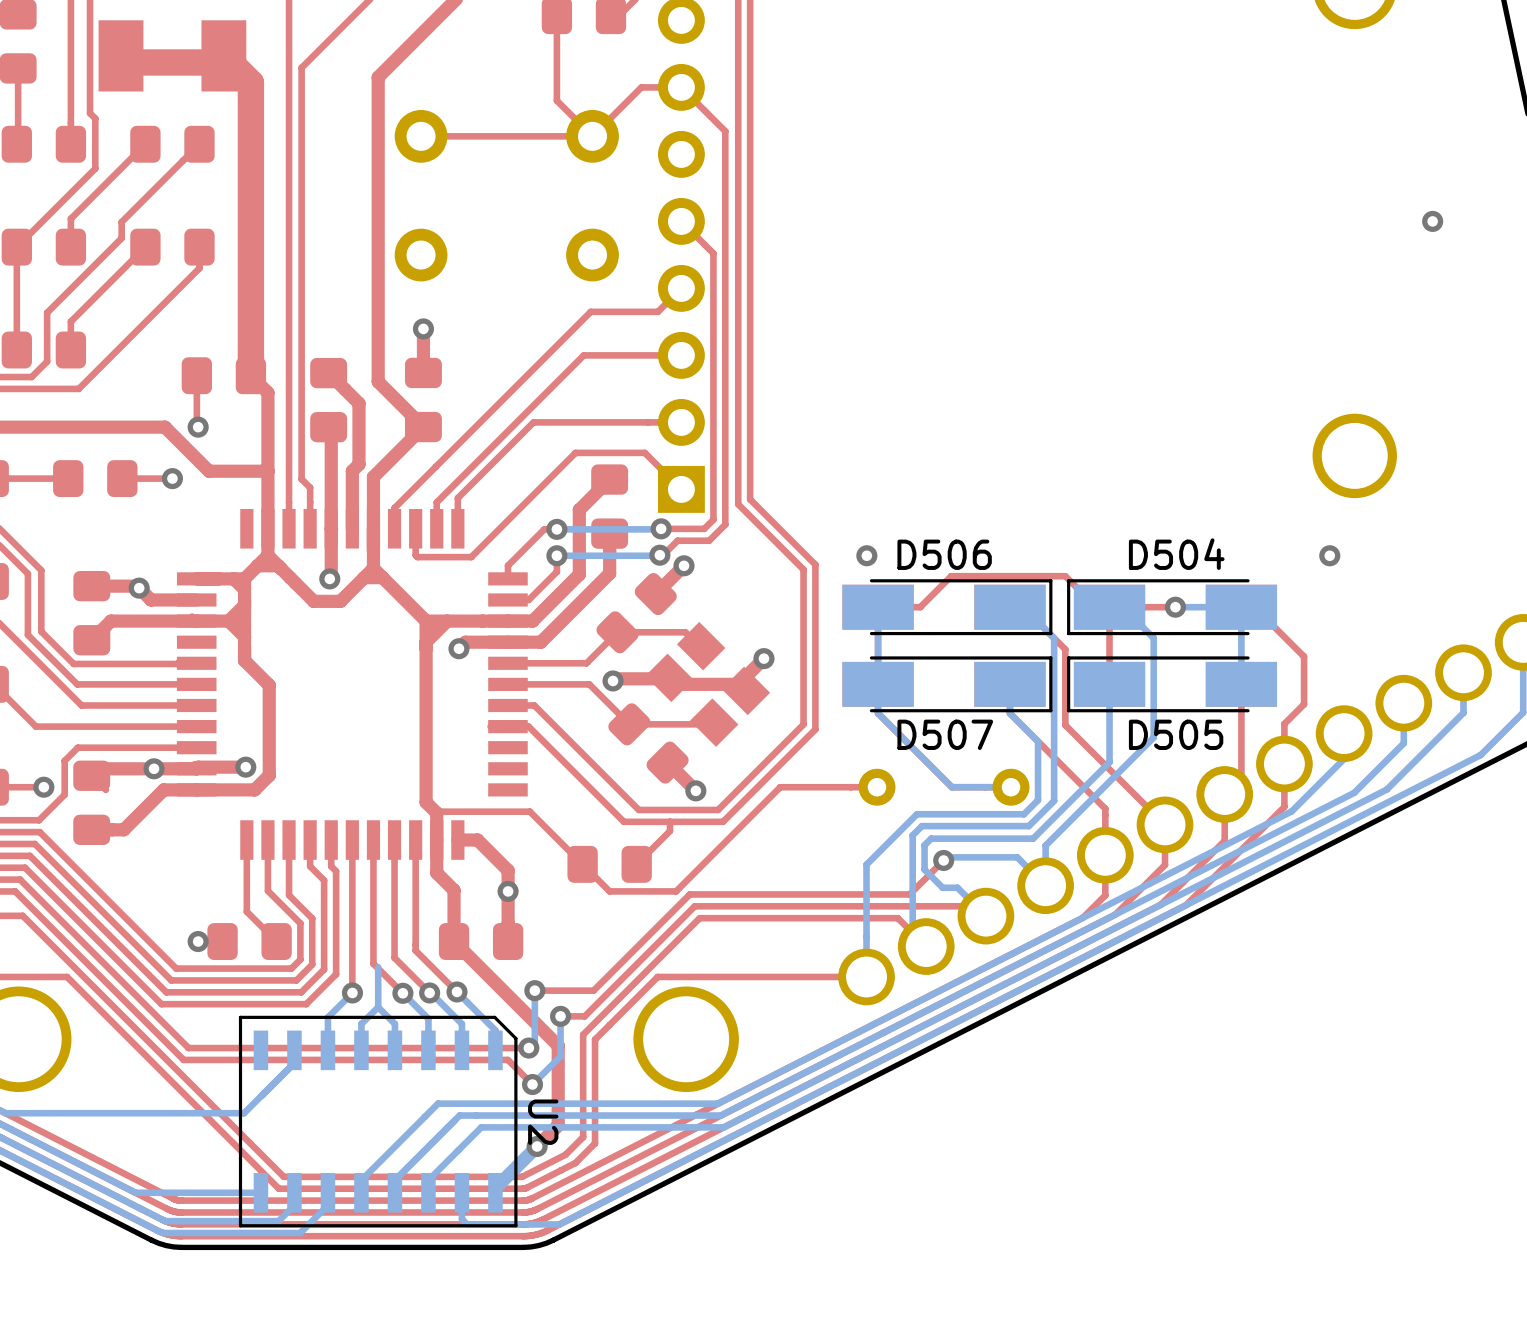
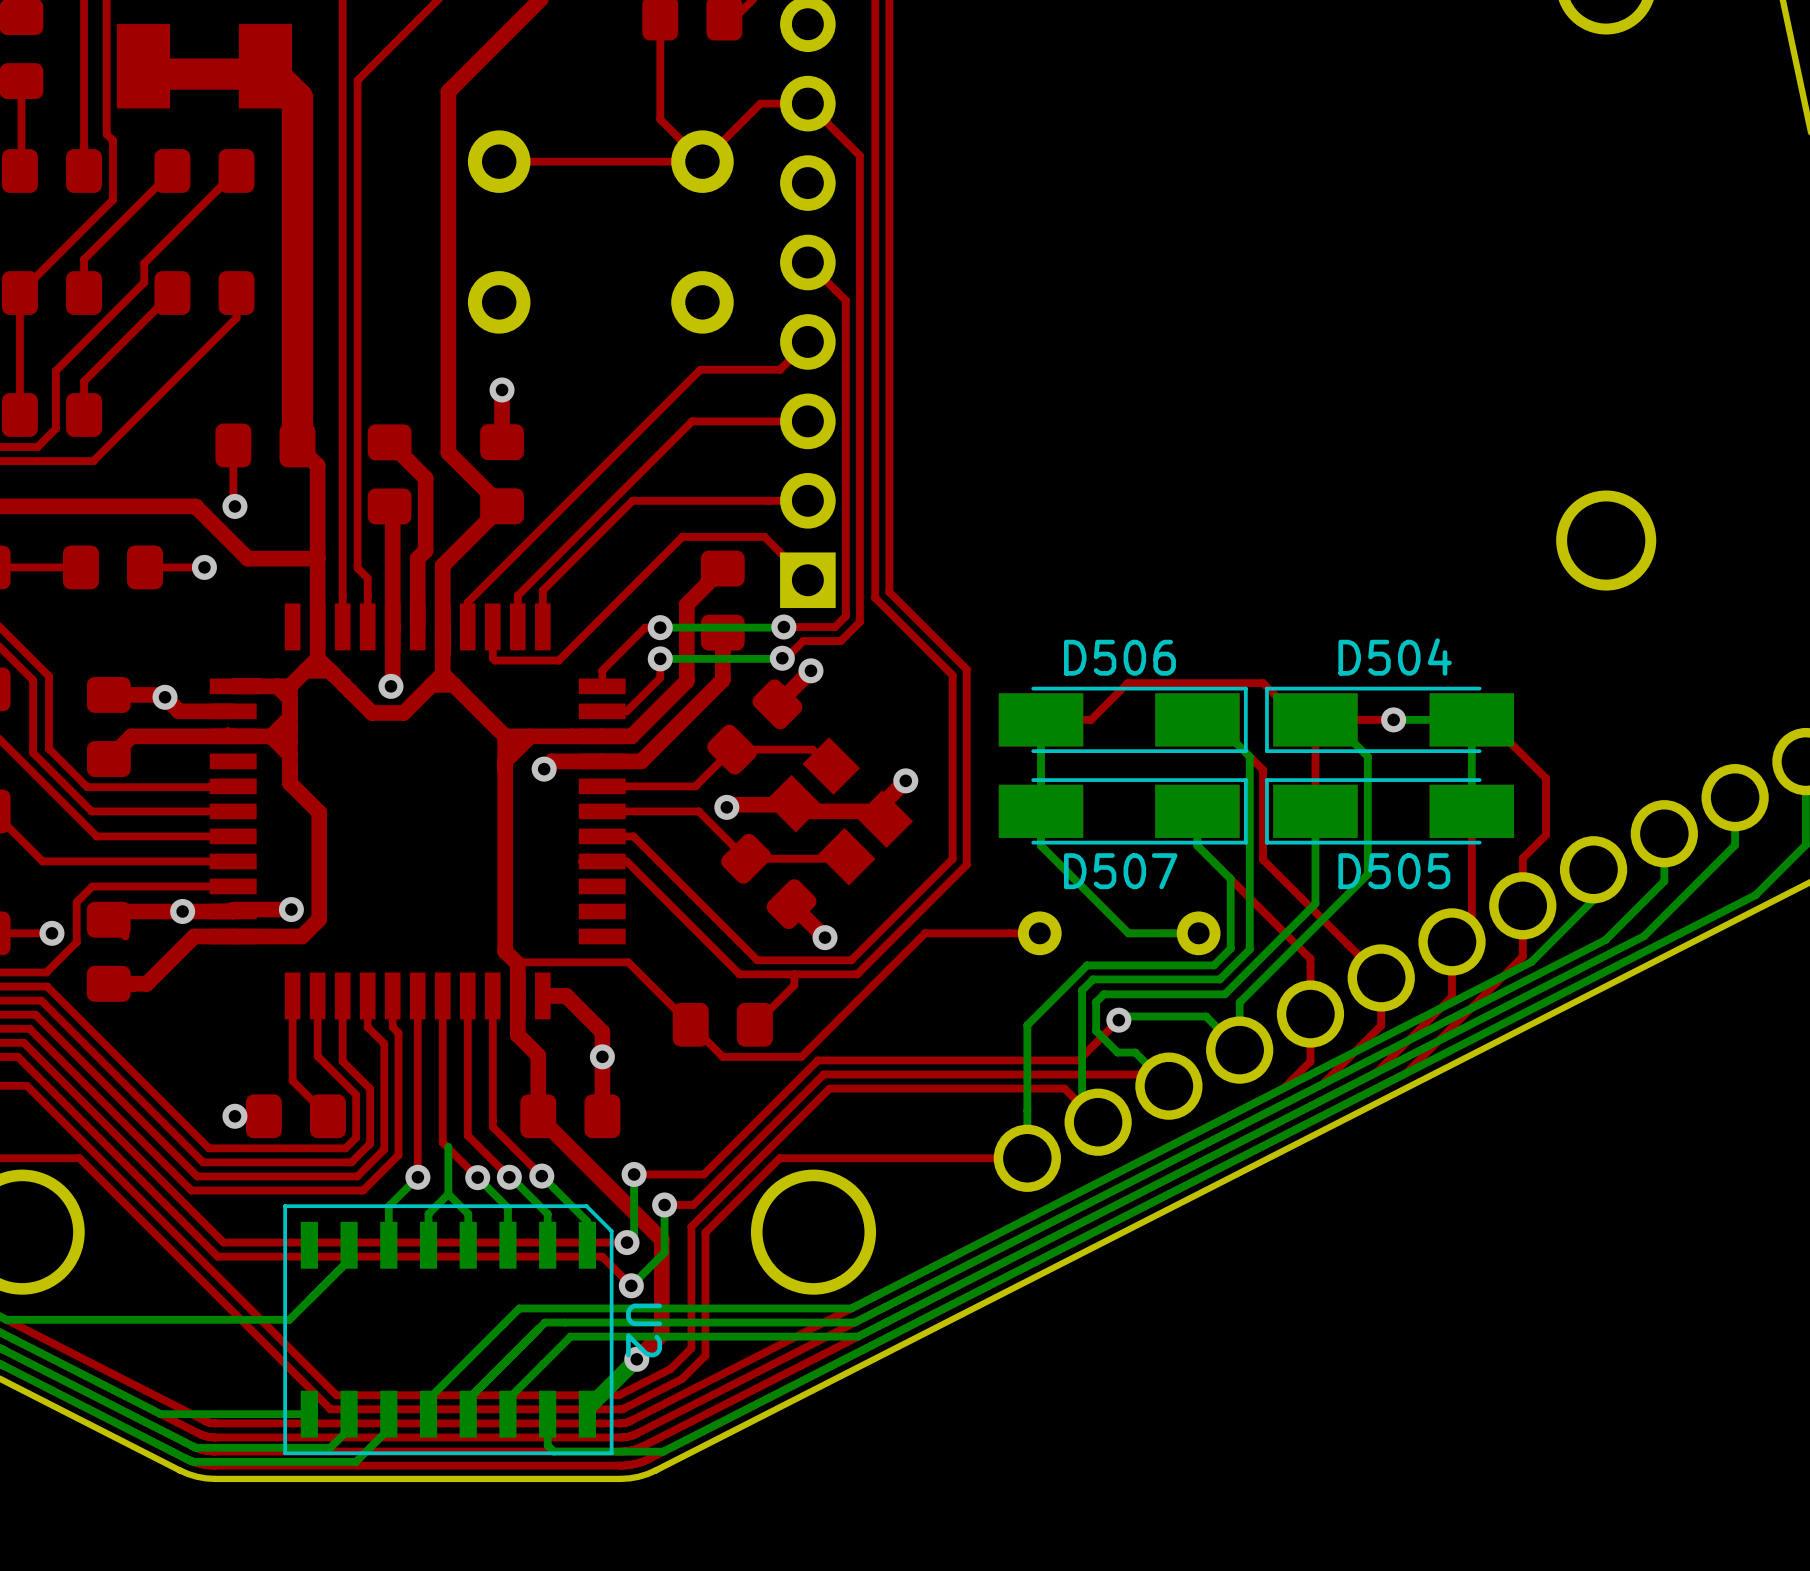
via: (1432, 221) -> none
via: (866, 555) -> none
via: (1329, 555) -> none

